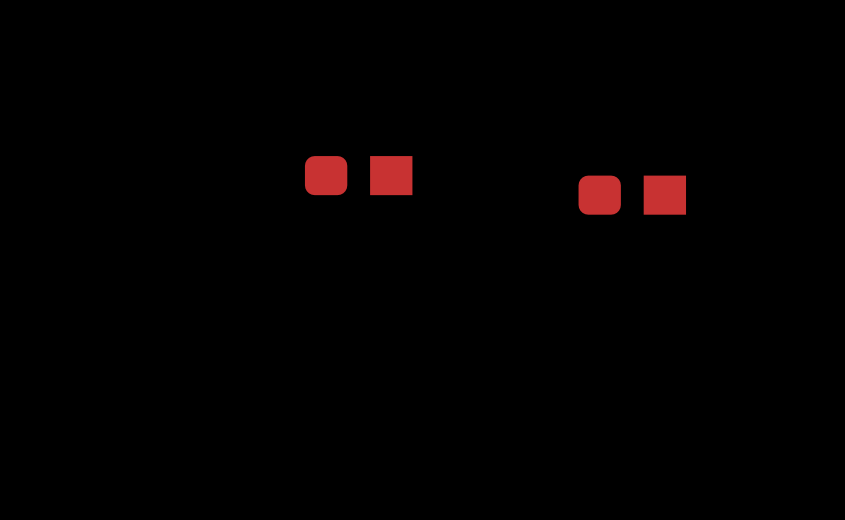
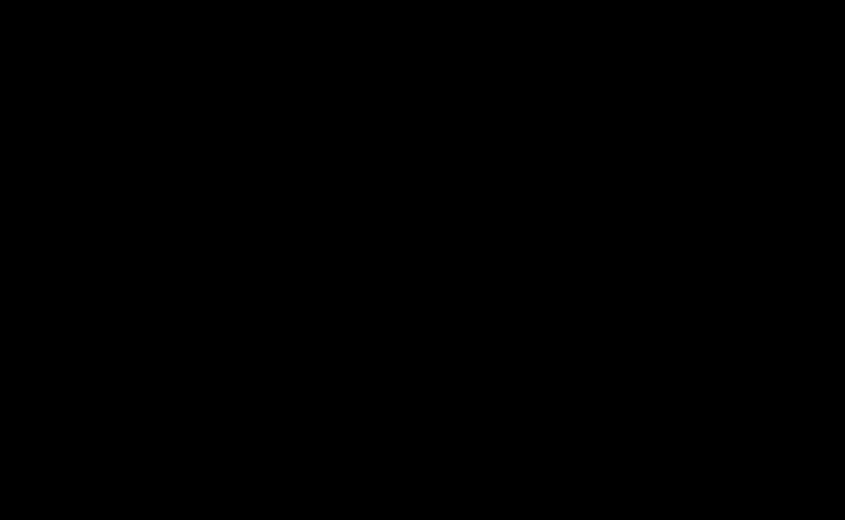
part: (358, 175) -> none
part: (632, 195) -> none

